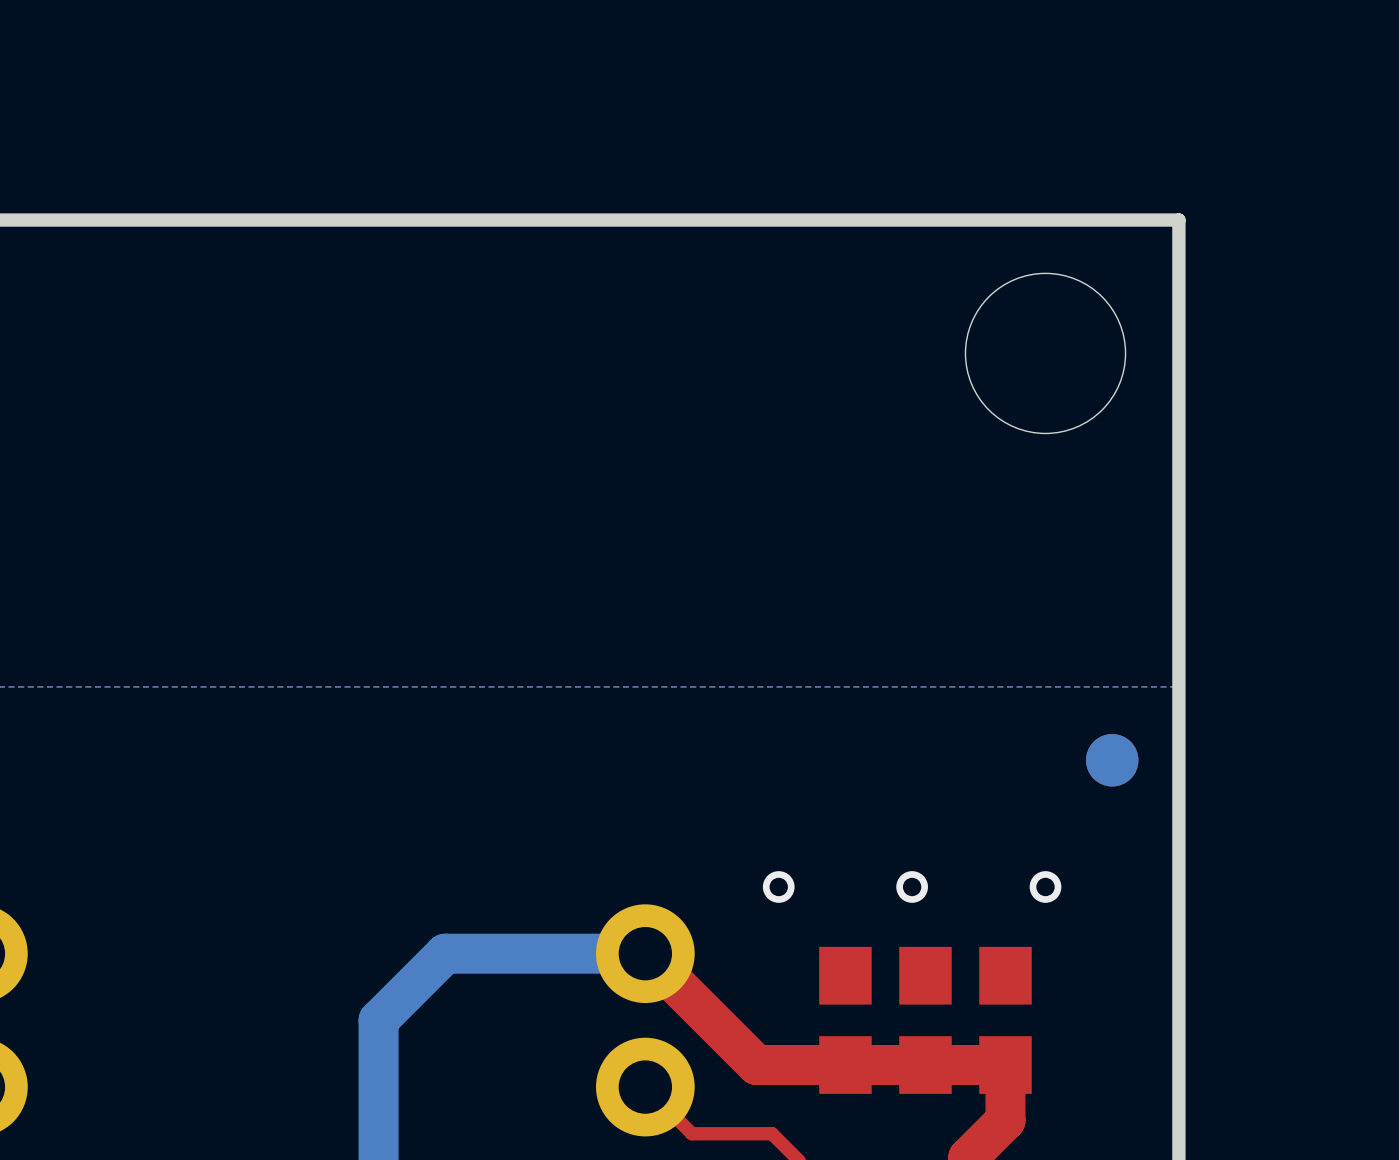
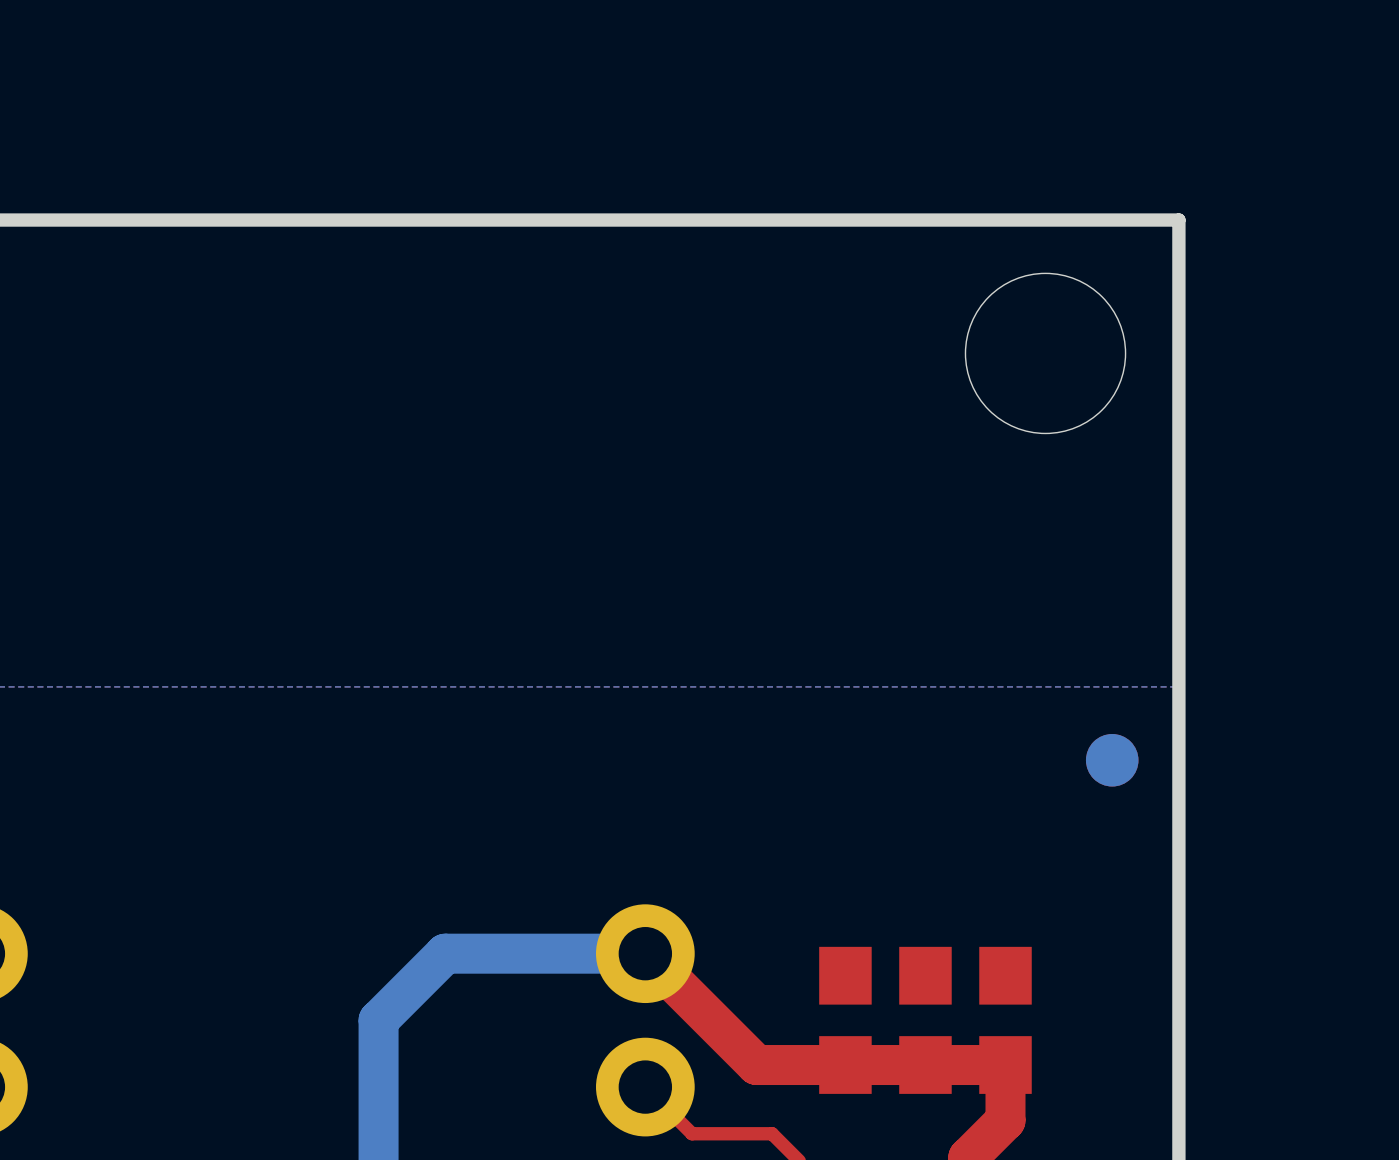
via: (778, 886) -> none
via: (912, 886) -> none
via: (1045, 886) -> none

